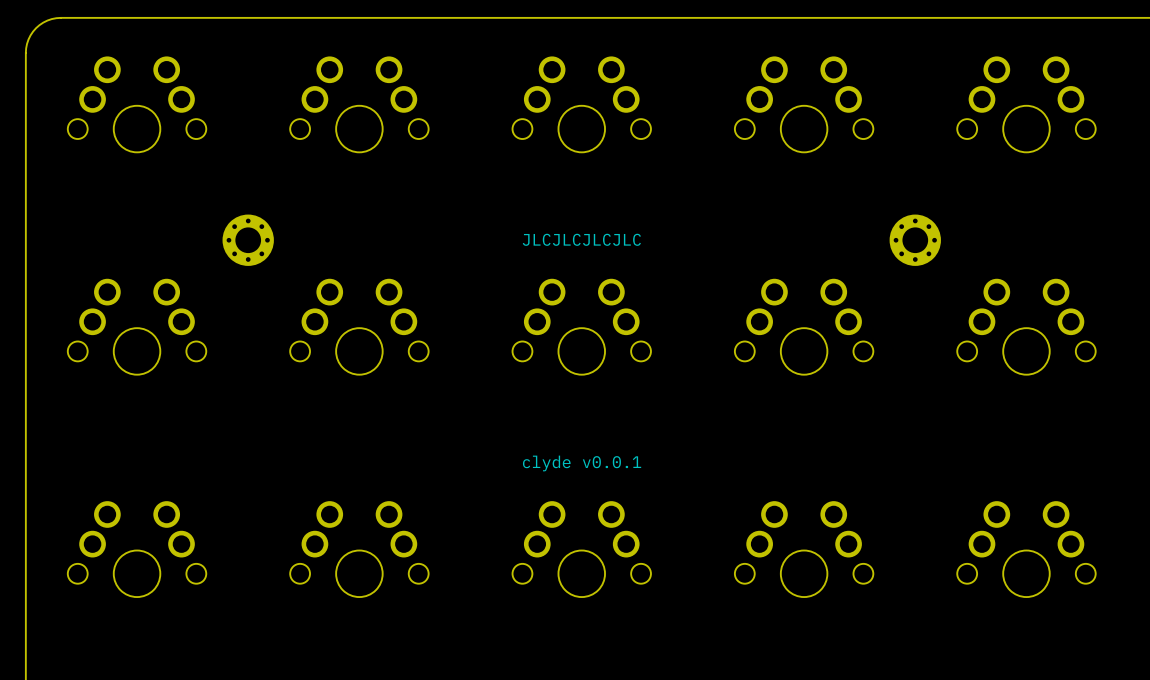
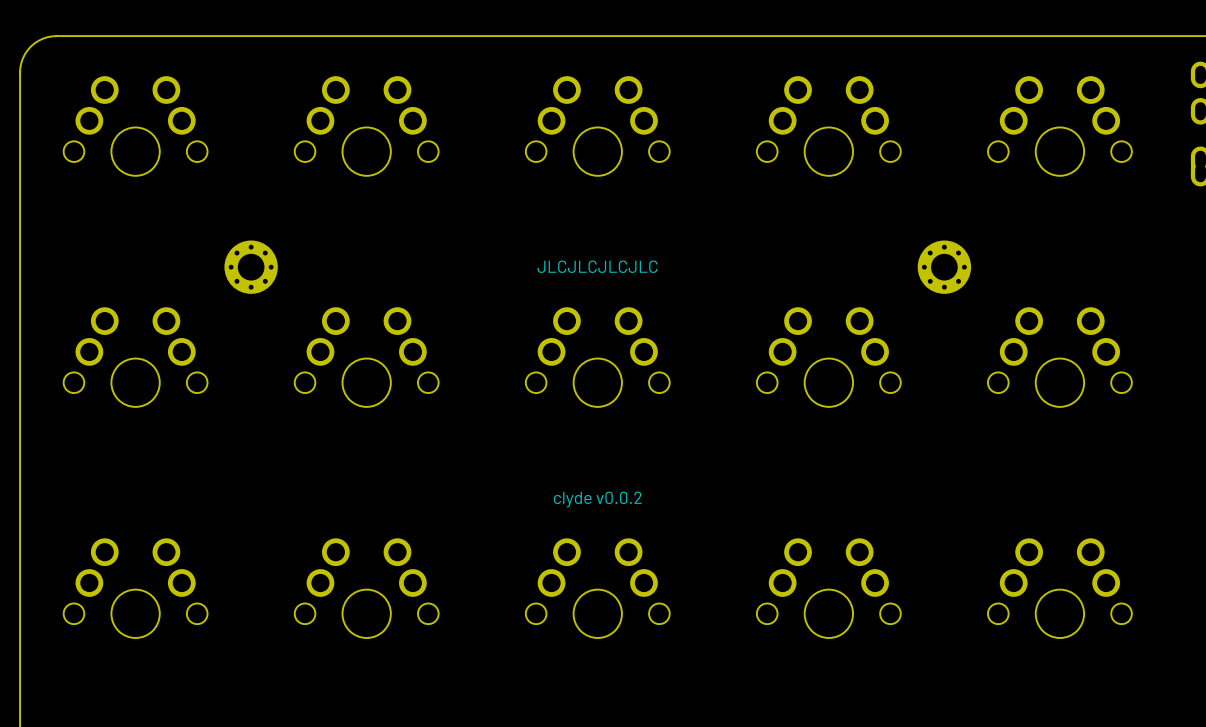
text: clyde v0.0.1 (582, 463) -> clyde v0.0.2 (597, 499)

